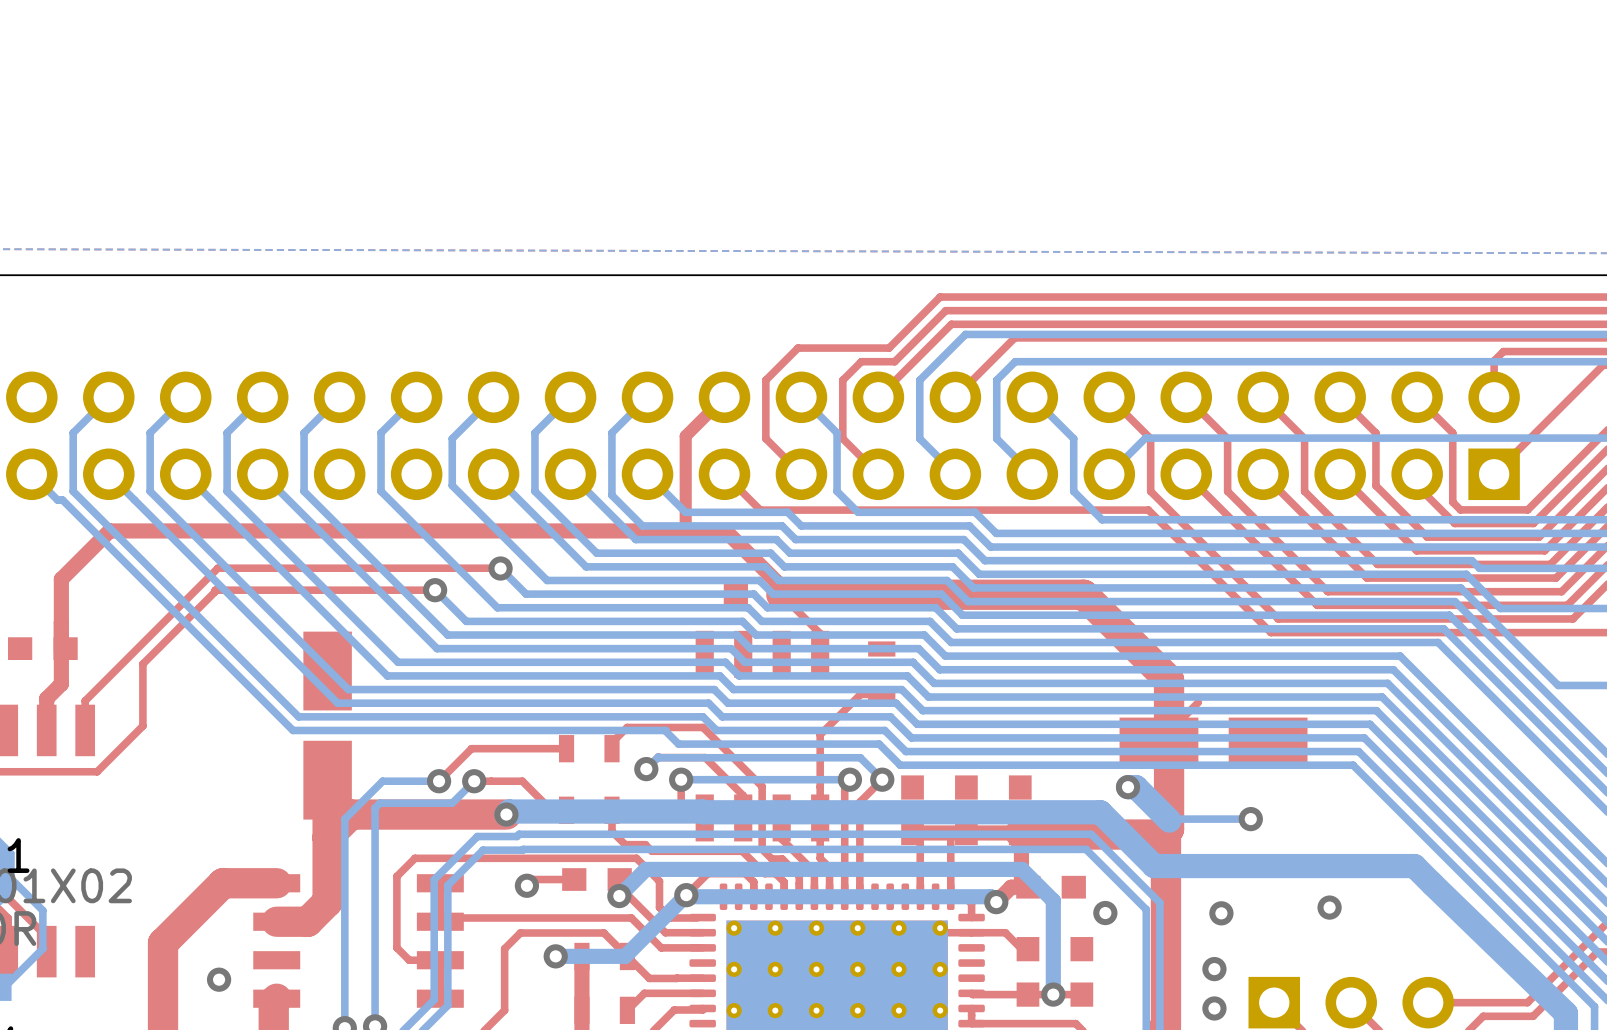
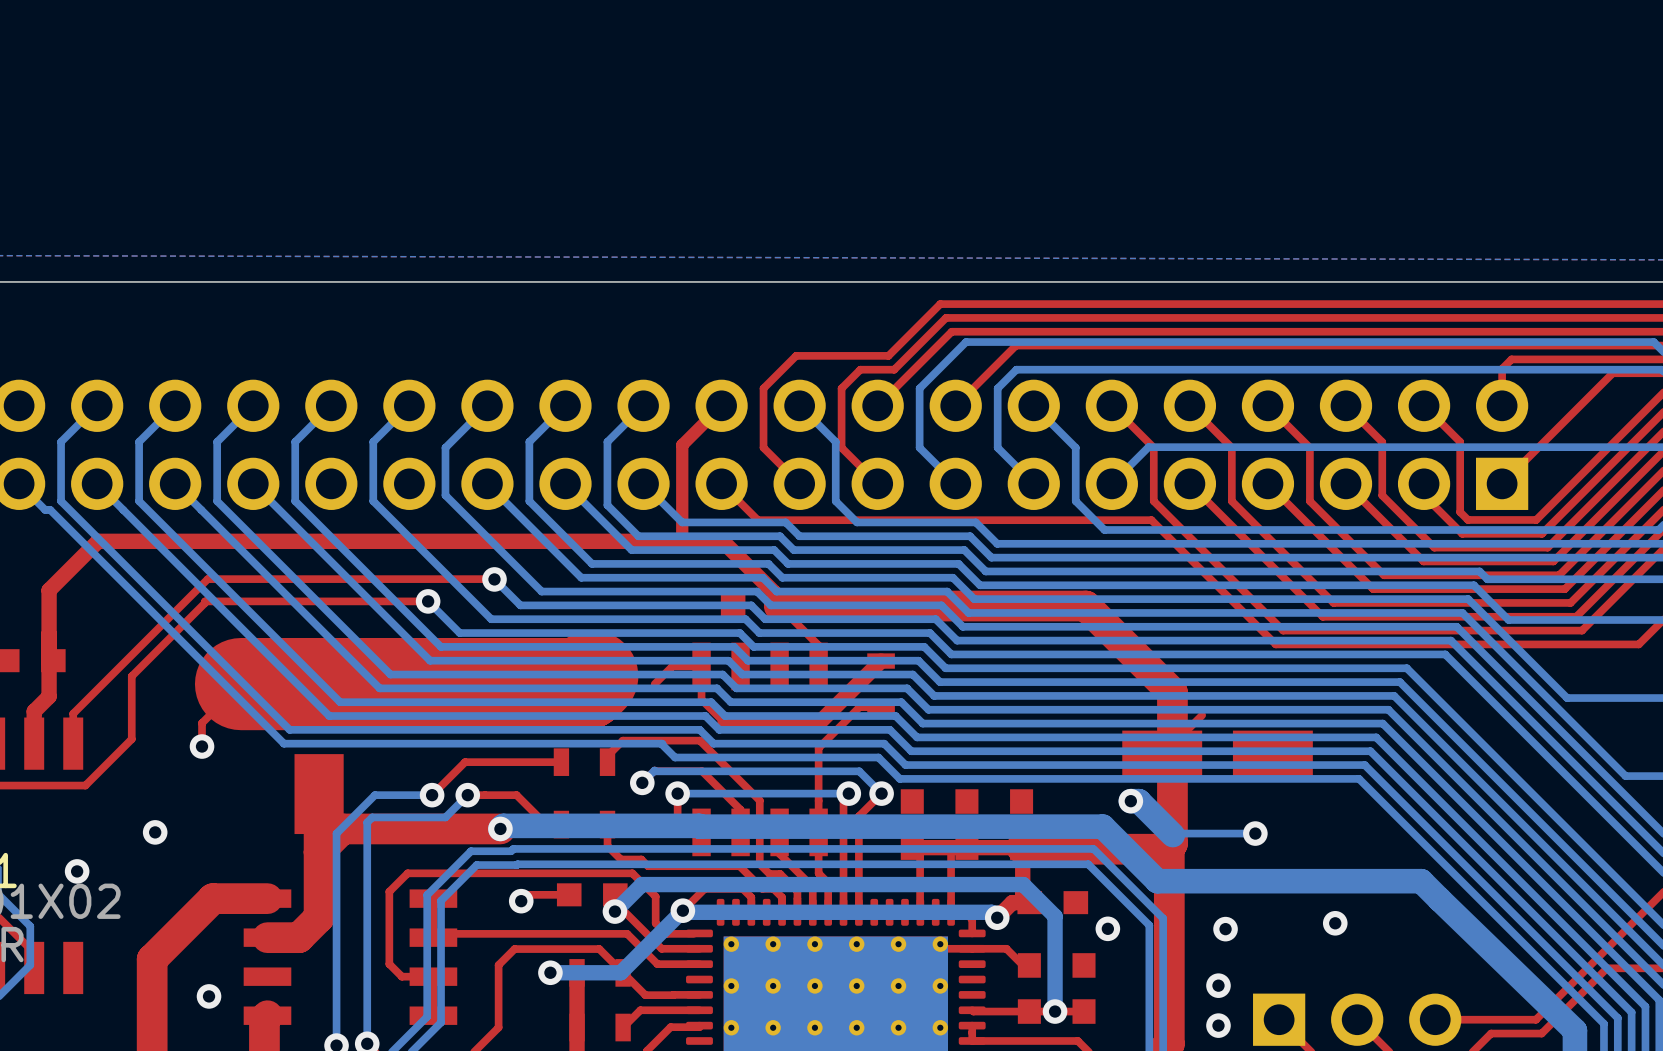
top track: none -> (881, 661) (819, 723) (724, 723) (701, 699) (701, 666) (672, 666) (654, 684)
top track: none -> (592, 676) (584, 684) (241, 684) (202, 723) (202, 746)
via: none -> (202, 746)
via: none -> (155, 832)
via: none -> (77, 871)

